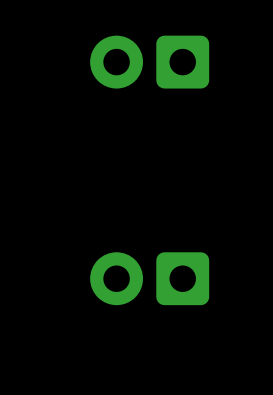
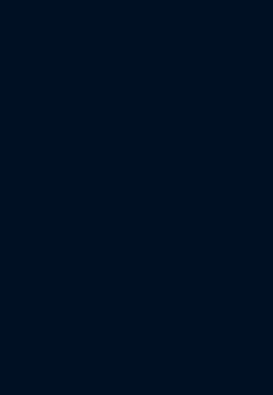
part: (149, 62) -> none
part: (149, 278) -> none

